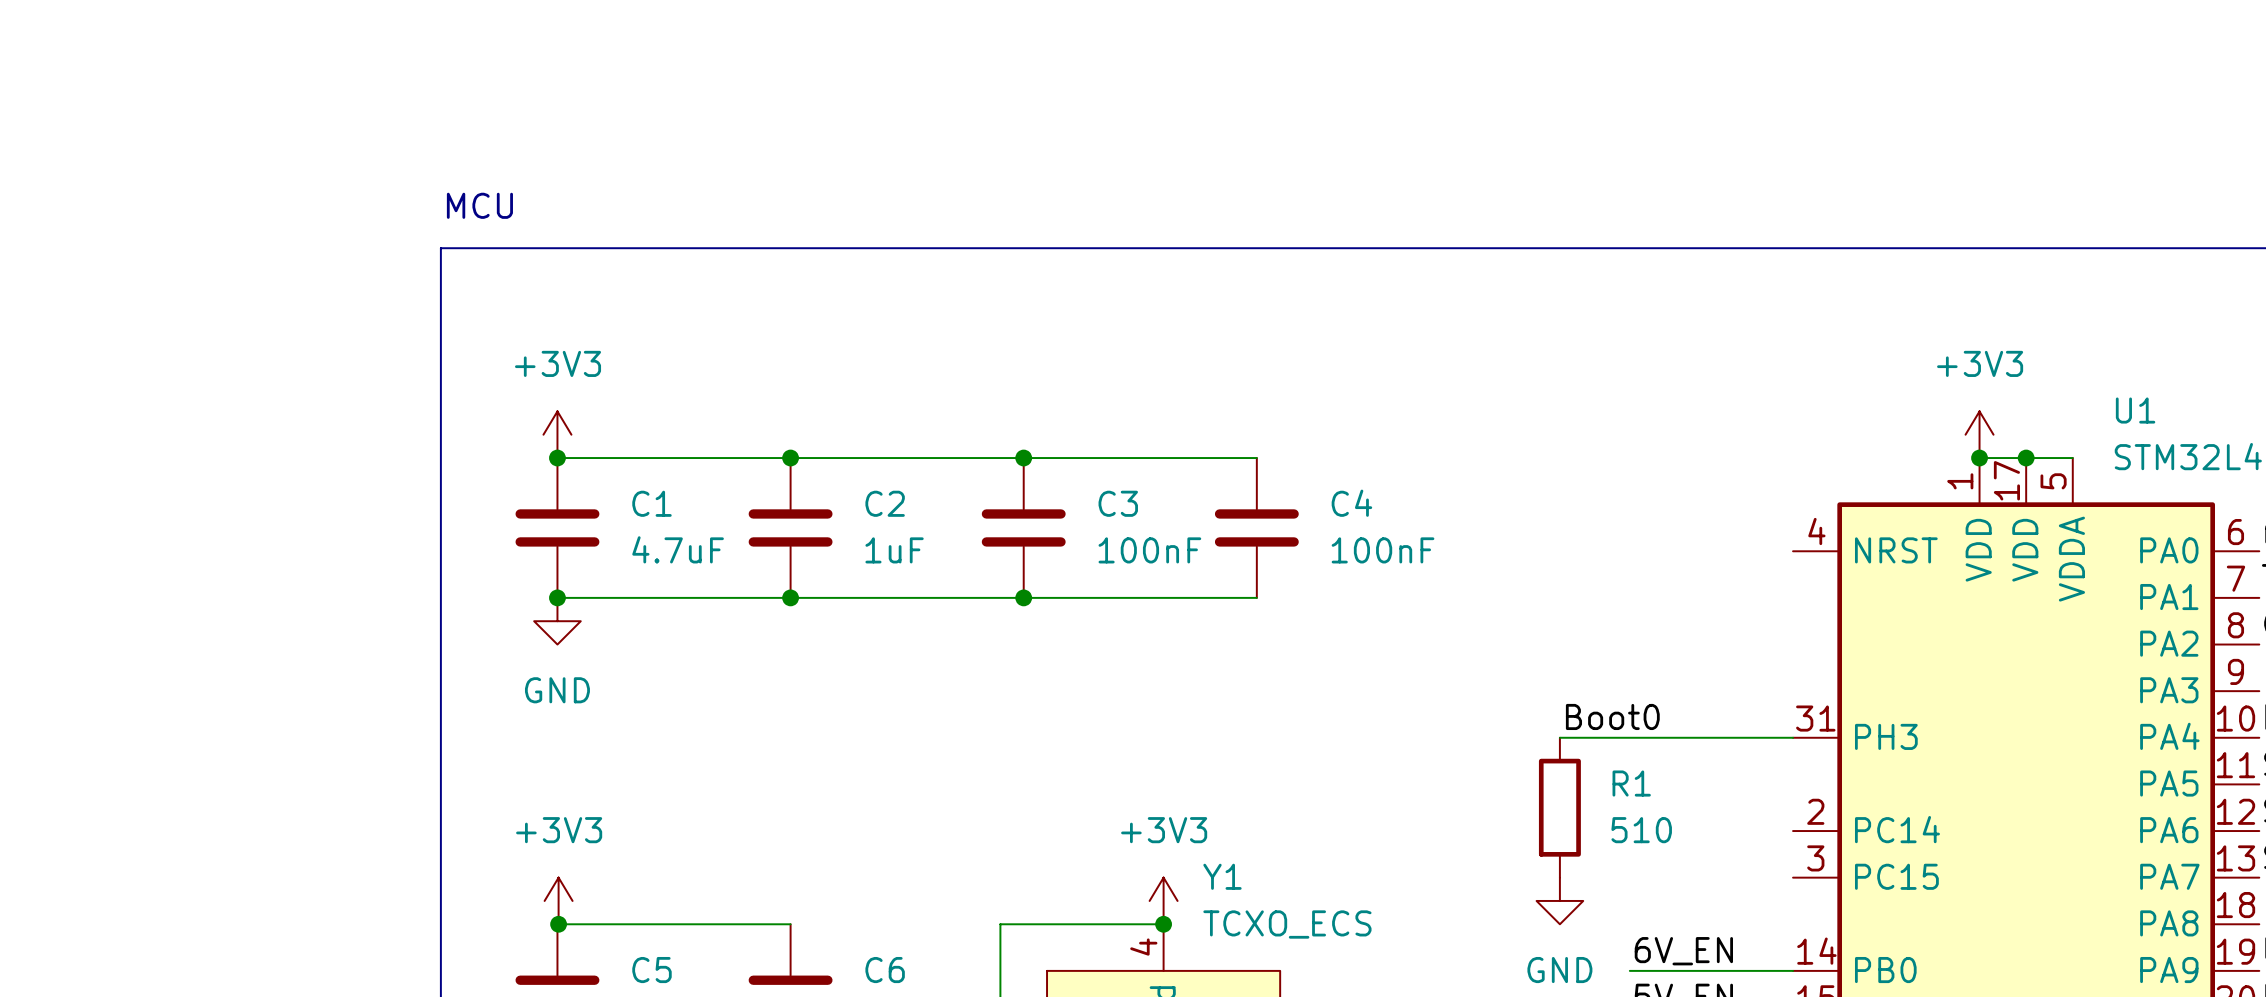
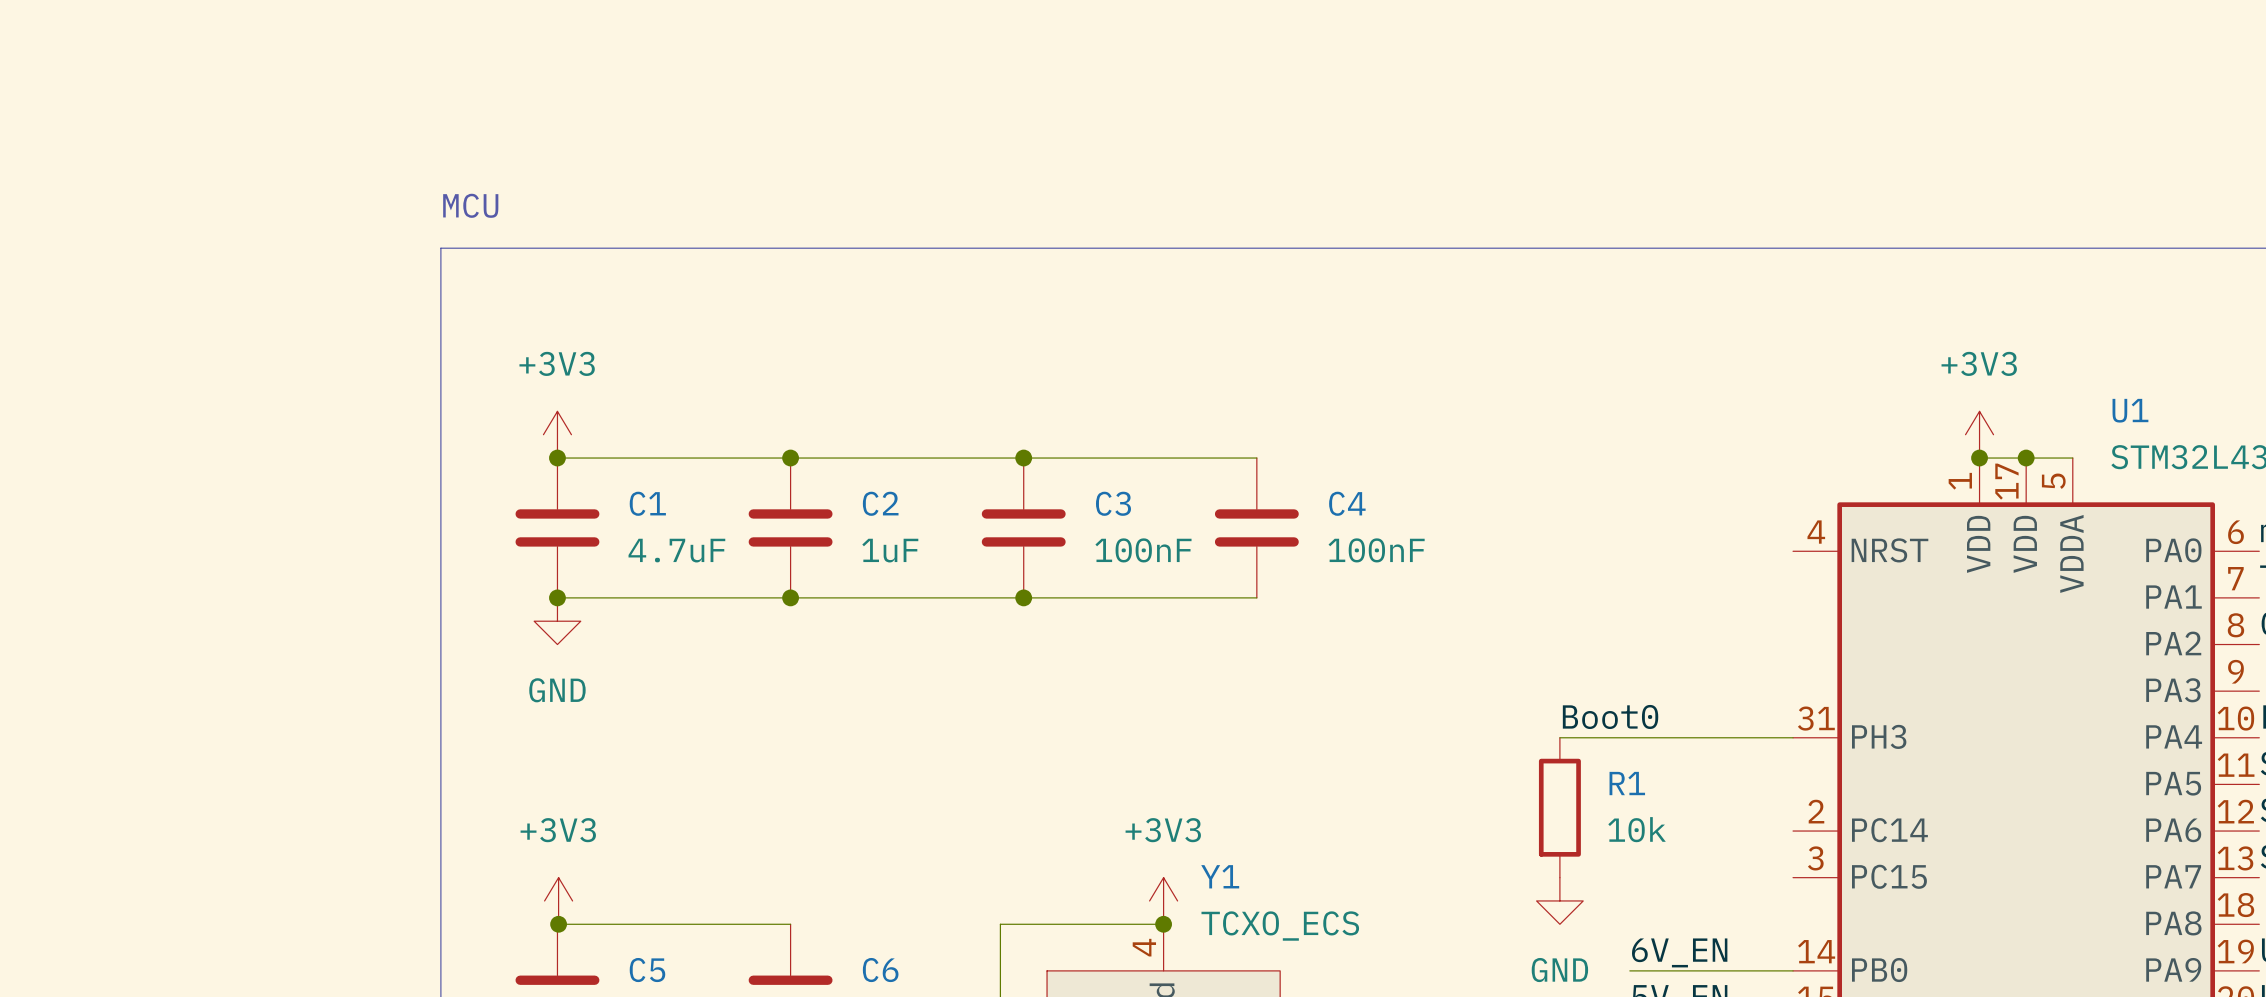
R1 value: 510 (1641, 830) -> 10k (1637, 829)

